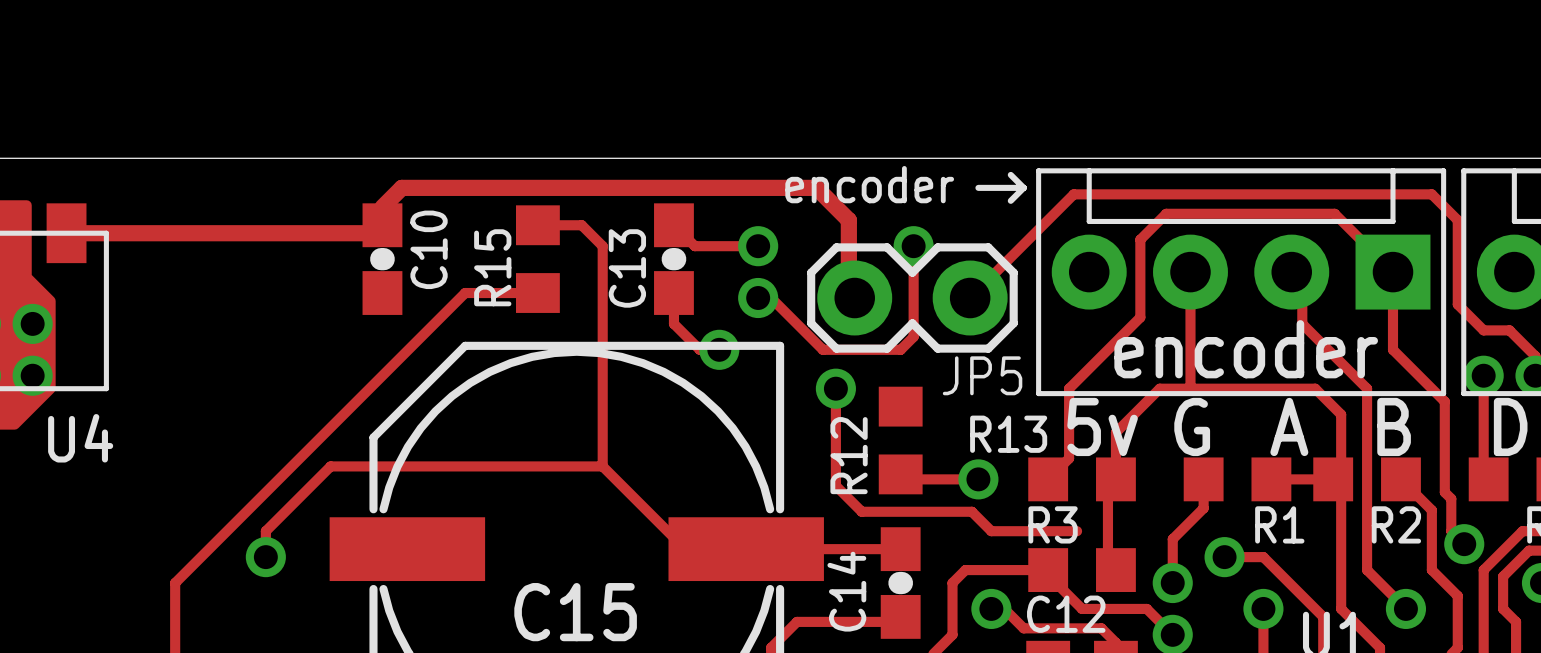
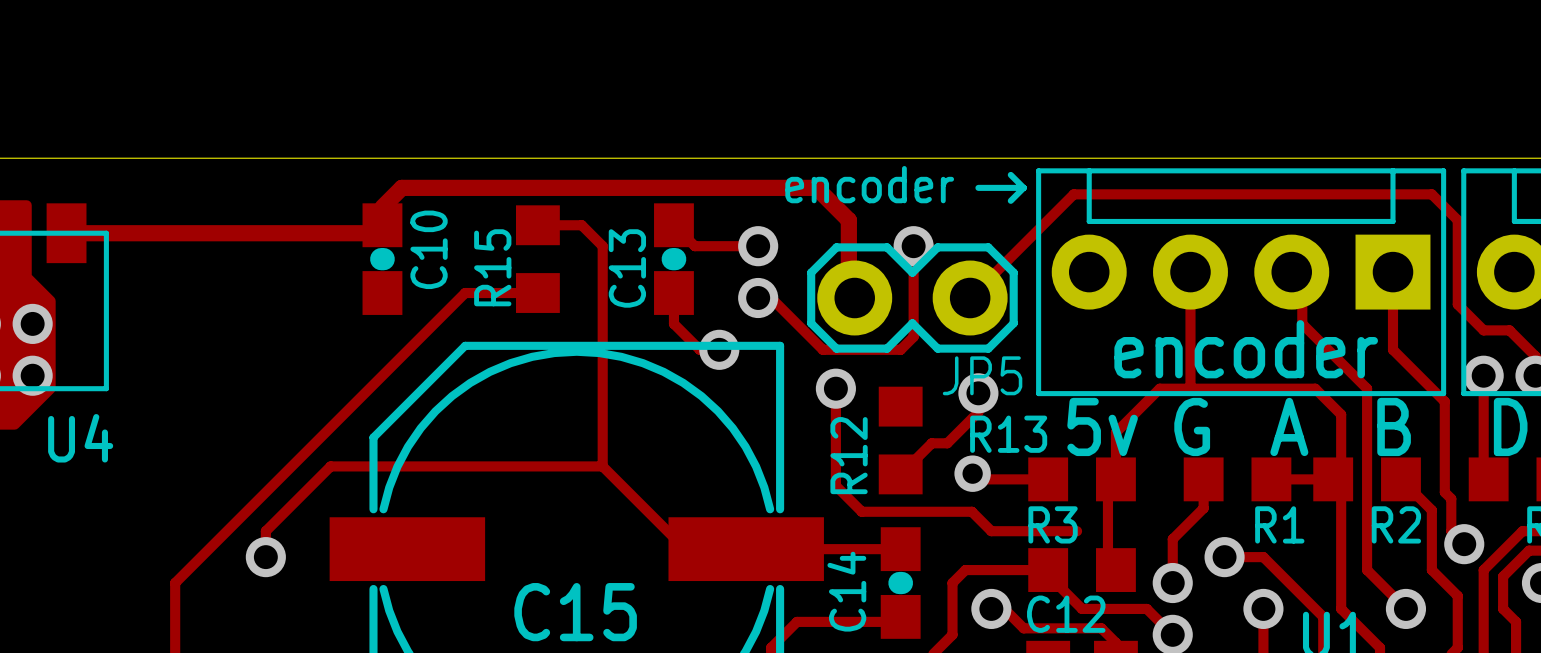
track: (1392, 272) (1334, 213) (1166, 213) (1140, 239) (1140, 317) (1069, 388) (1069, 458) (1048, 479) -> (972, 473) (978, 479) (1048, 479)
track: none -> (978, 393) (978, 412) (947, 443) (931, 443) (900, 474)
via: none -> (972, 473)
track: (905, 479) (978, 479) -> none
via position: (978, 479) -> (978, 393)

